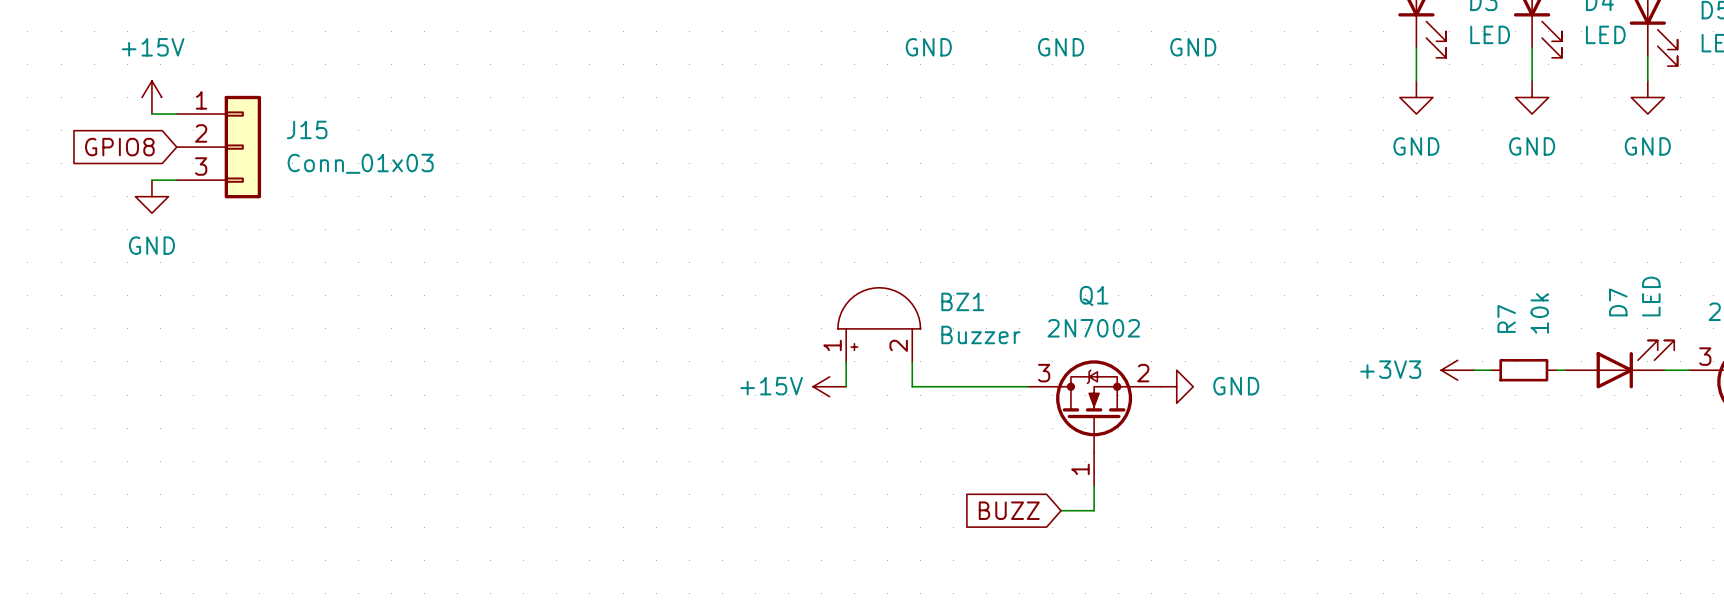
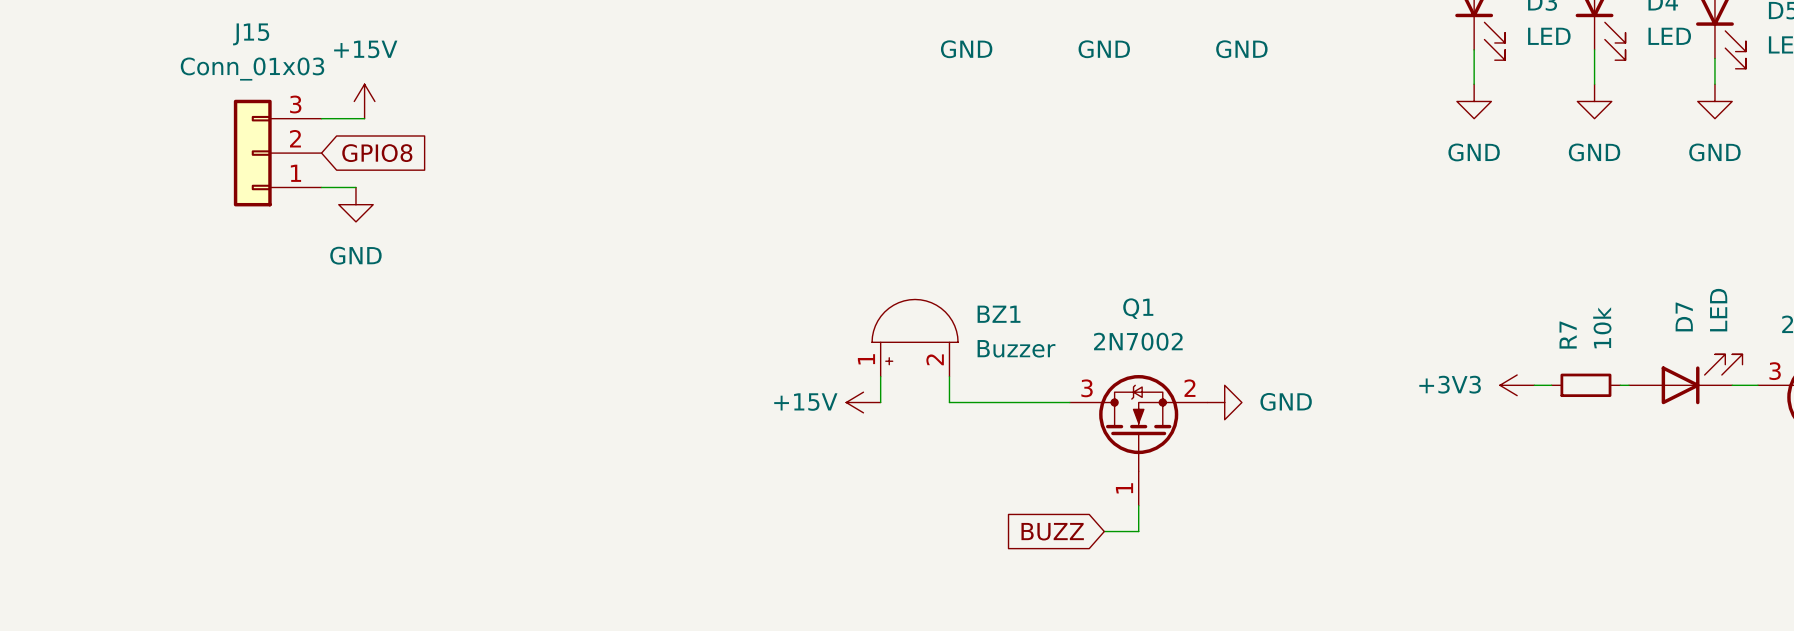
power symbol position: +15V (151, 97) -> +15V (364, 101)
wire: (151, 114) (176, 114) -> none
wire: none -> (321, 118) (364, 118)
J15 name position: J15 (307, 129) -> J15 (251, 34)
global label rotation: 0° (119, 147) -> 180° (377, 153)
global label position: GPIO8 (119, 147) -> GPIO8 (377, 153)
J15 rotation: 0° (242, 147) -> 180° (252, 153)
J15 value position: Conn_01x03 (360, 163) -> Conn_01x03 (252, 69)
wire: (151, 180) (176, 180) -> none
wire: none -> (321, 187) (355, 187)
power symbol: GND (151, 196) -> none
power symbol: none -> GND (355, 204)

